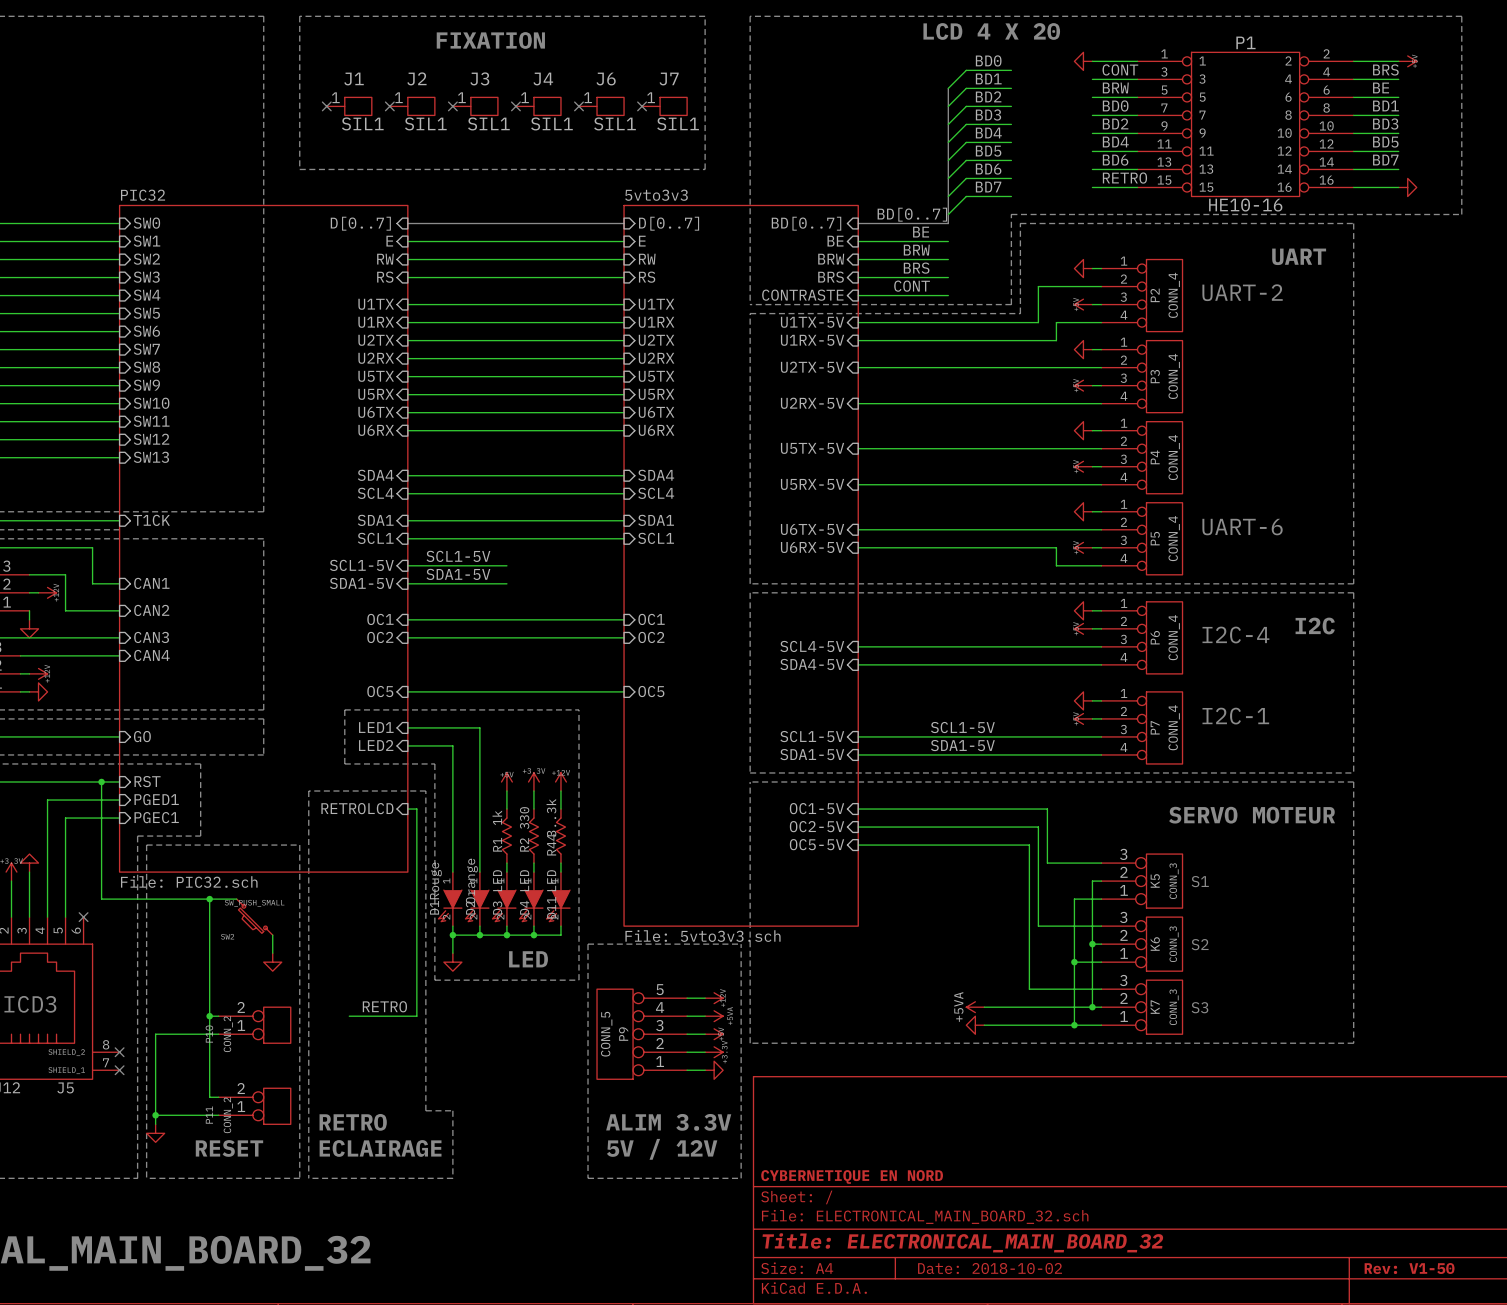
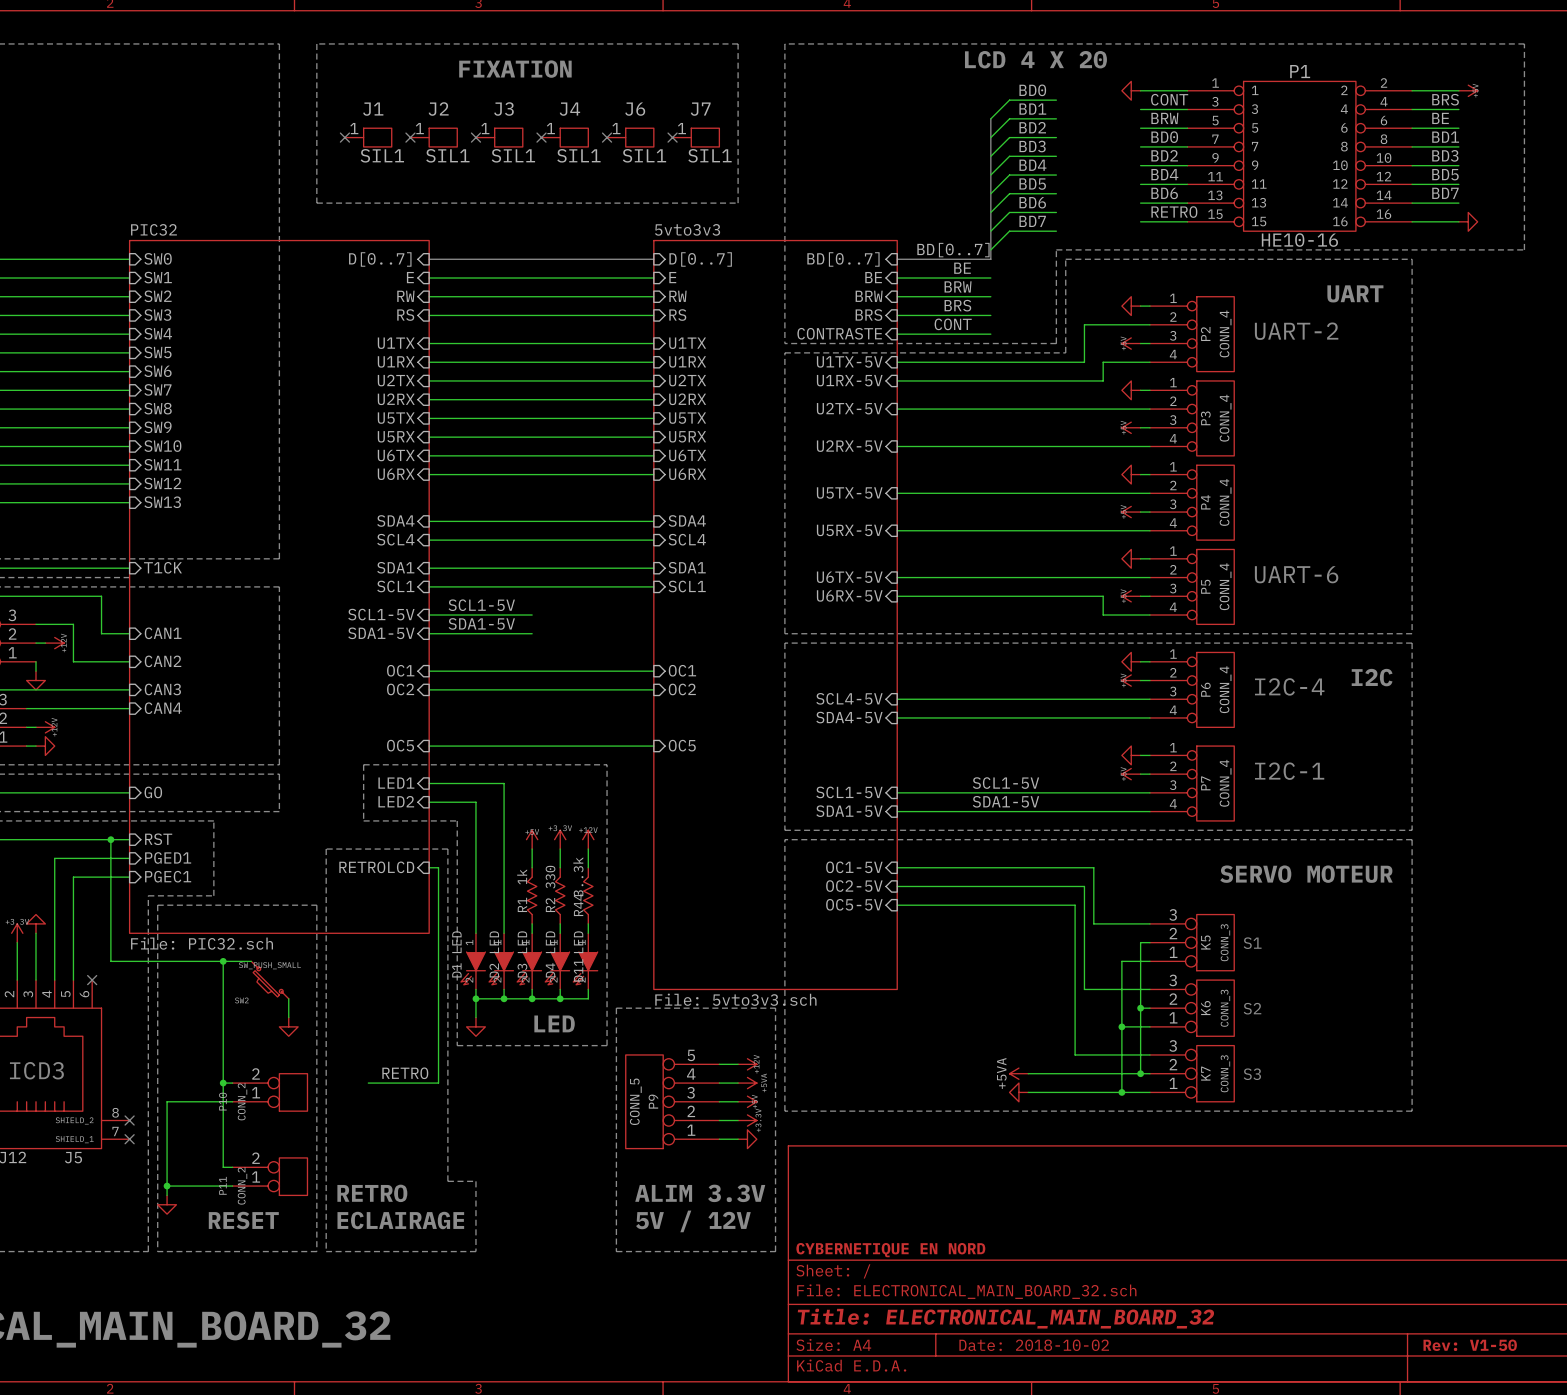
D1 value: Rouge (435, 880) -> LED (456, 942)
D2 value: Orange (471, 881) -> LED (494, 942)

